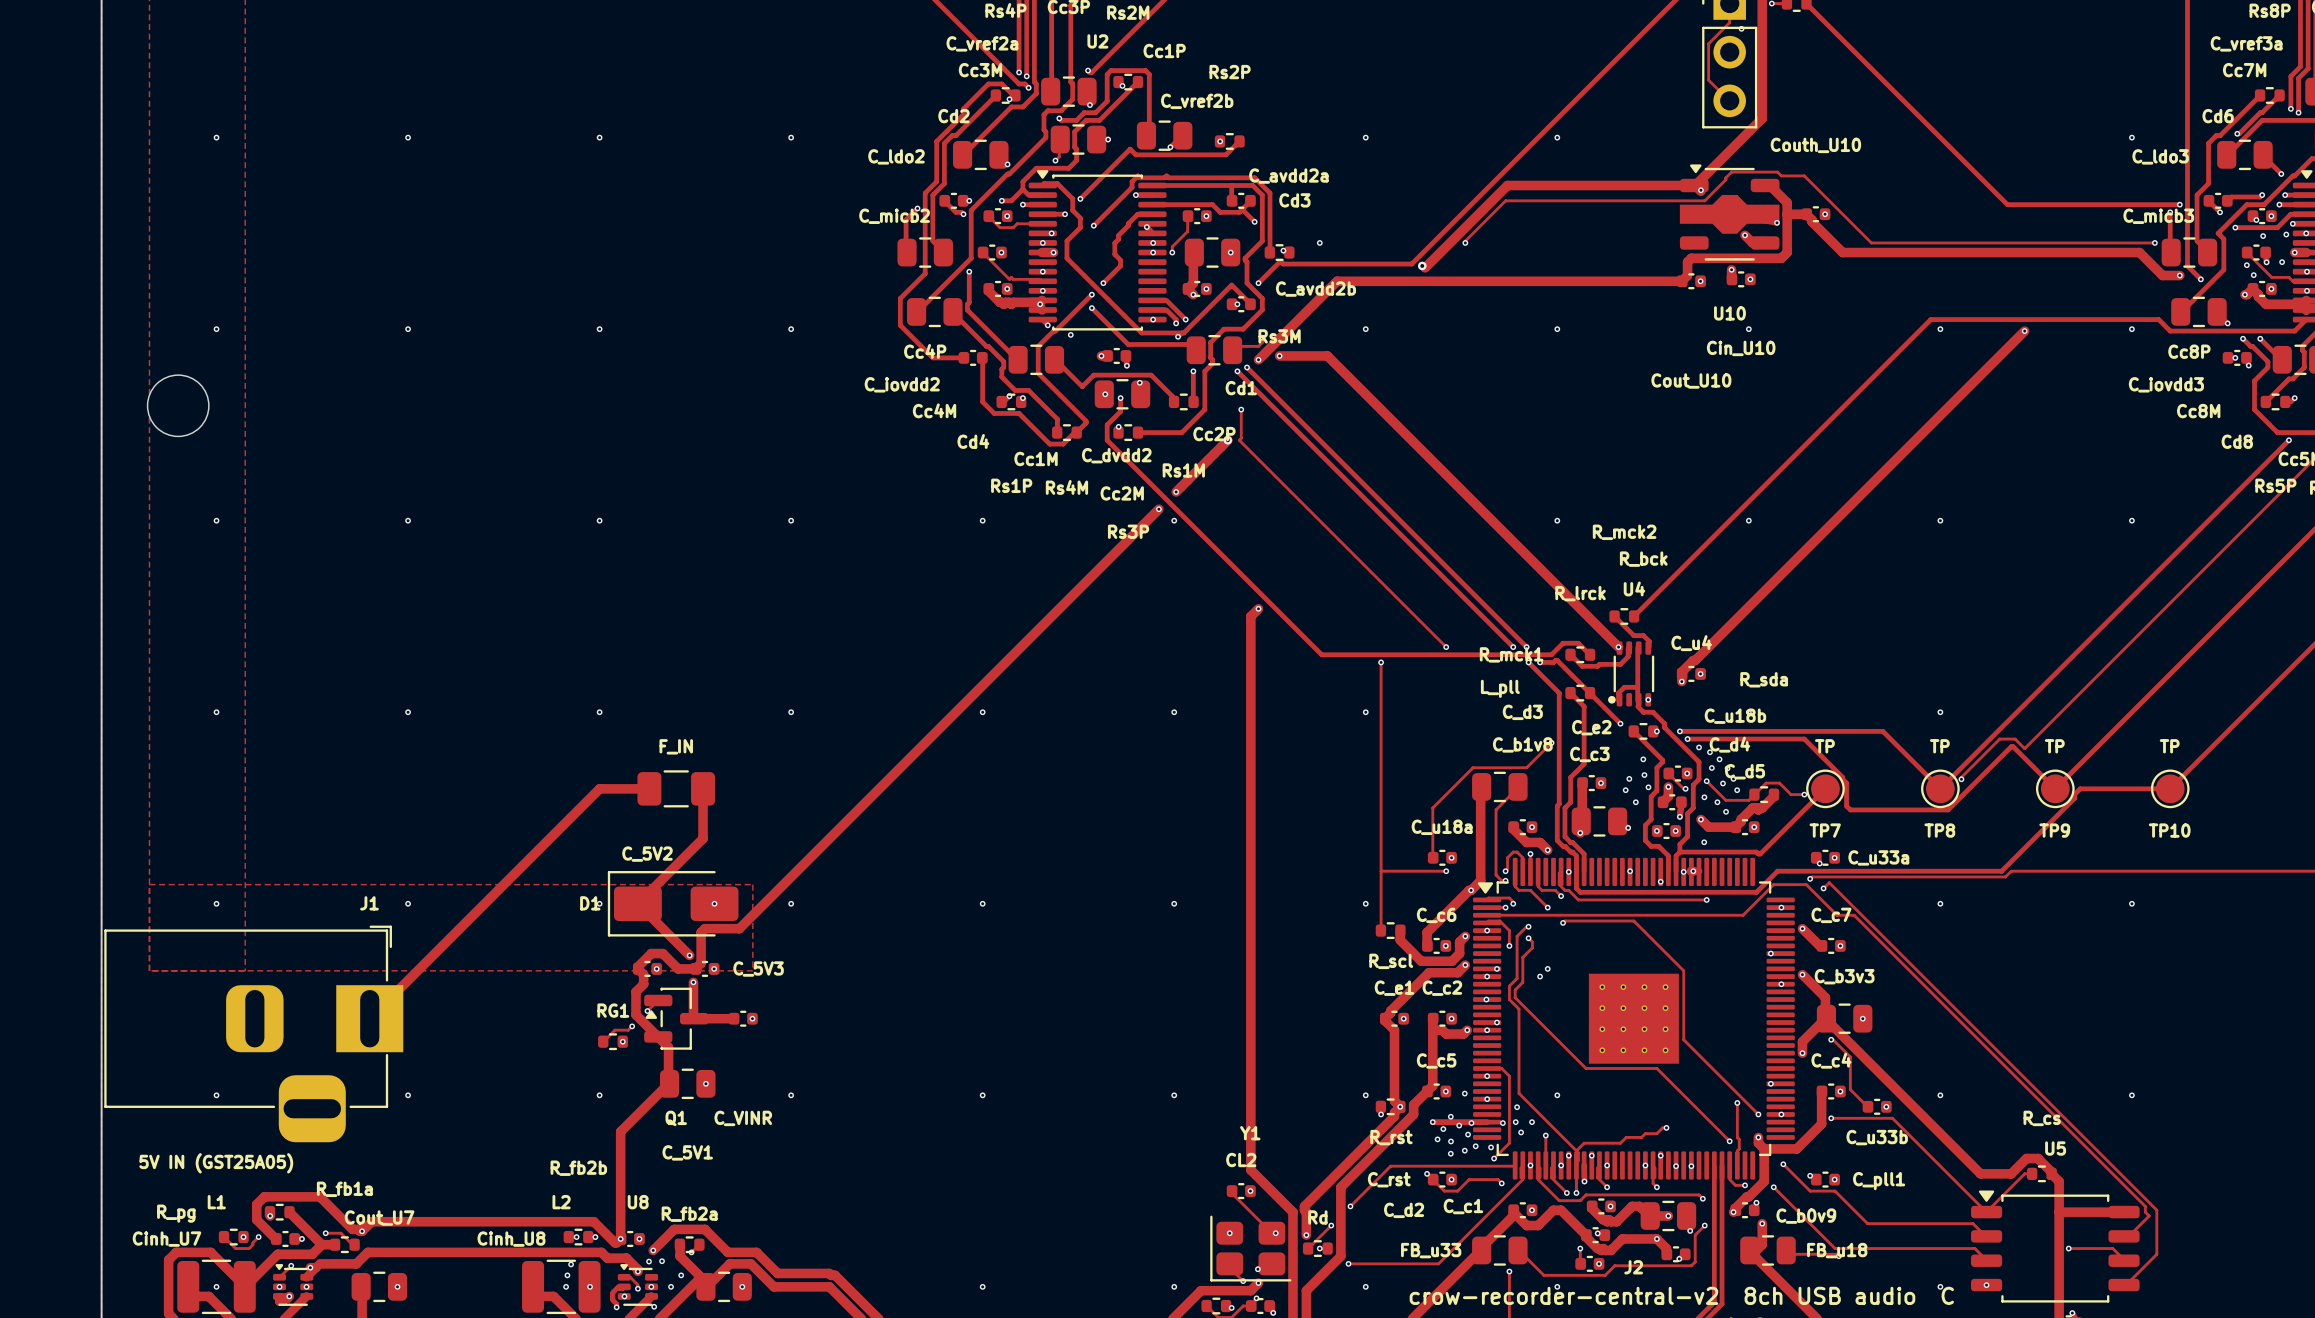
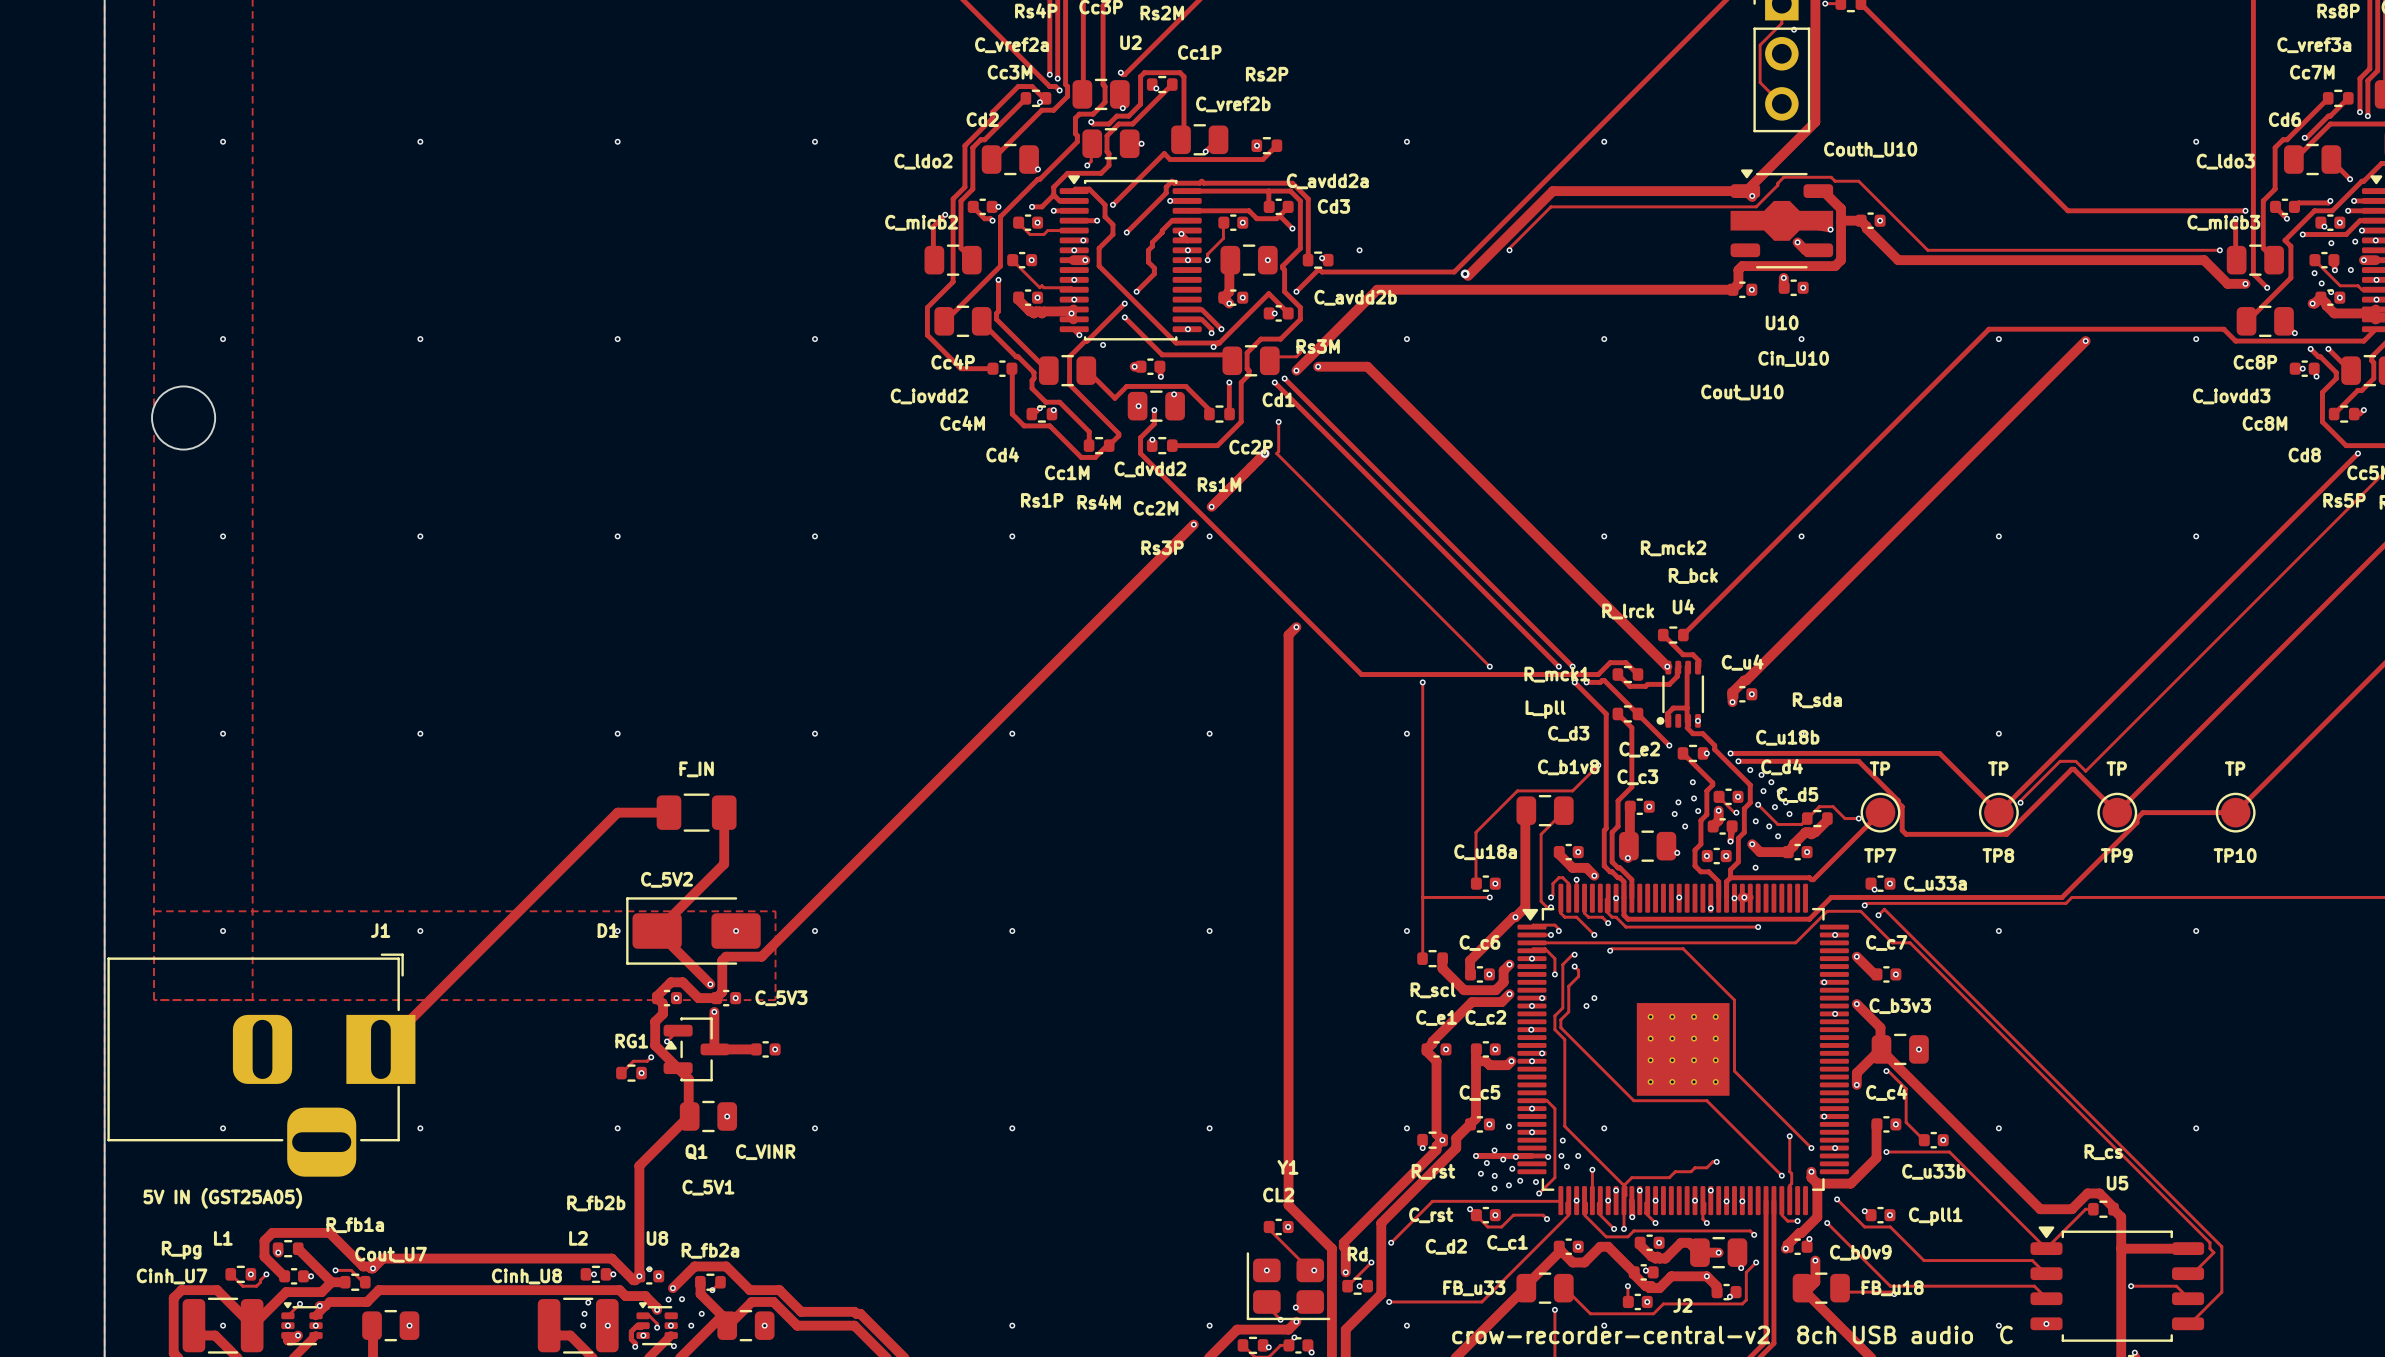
via: none -> (2331, 292)
via: none -> (649, 1269)

